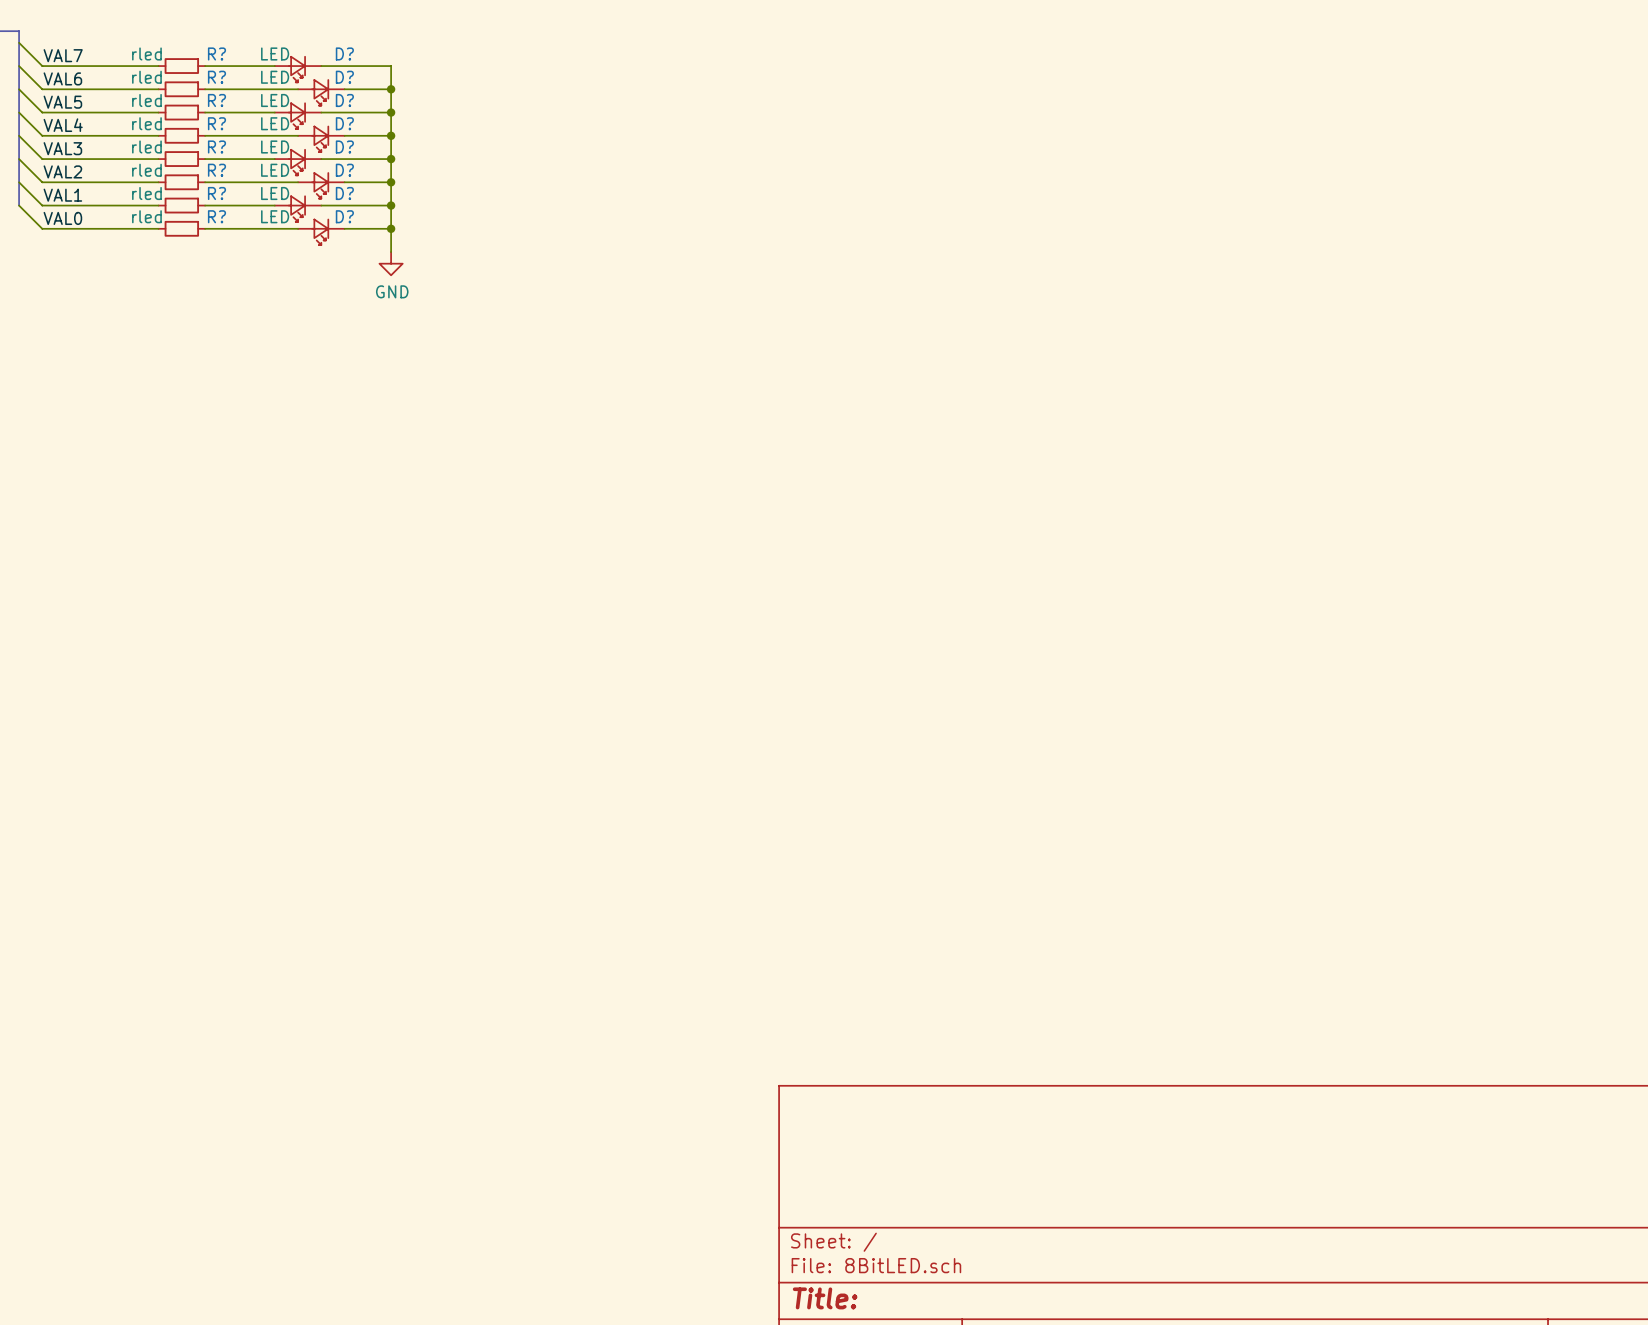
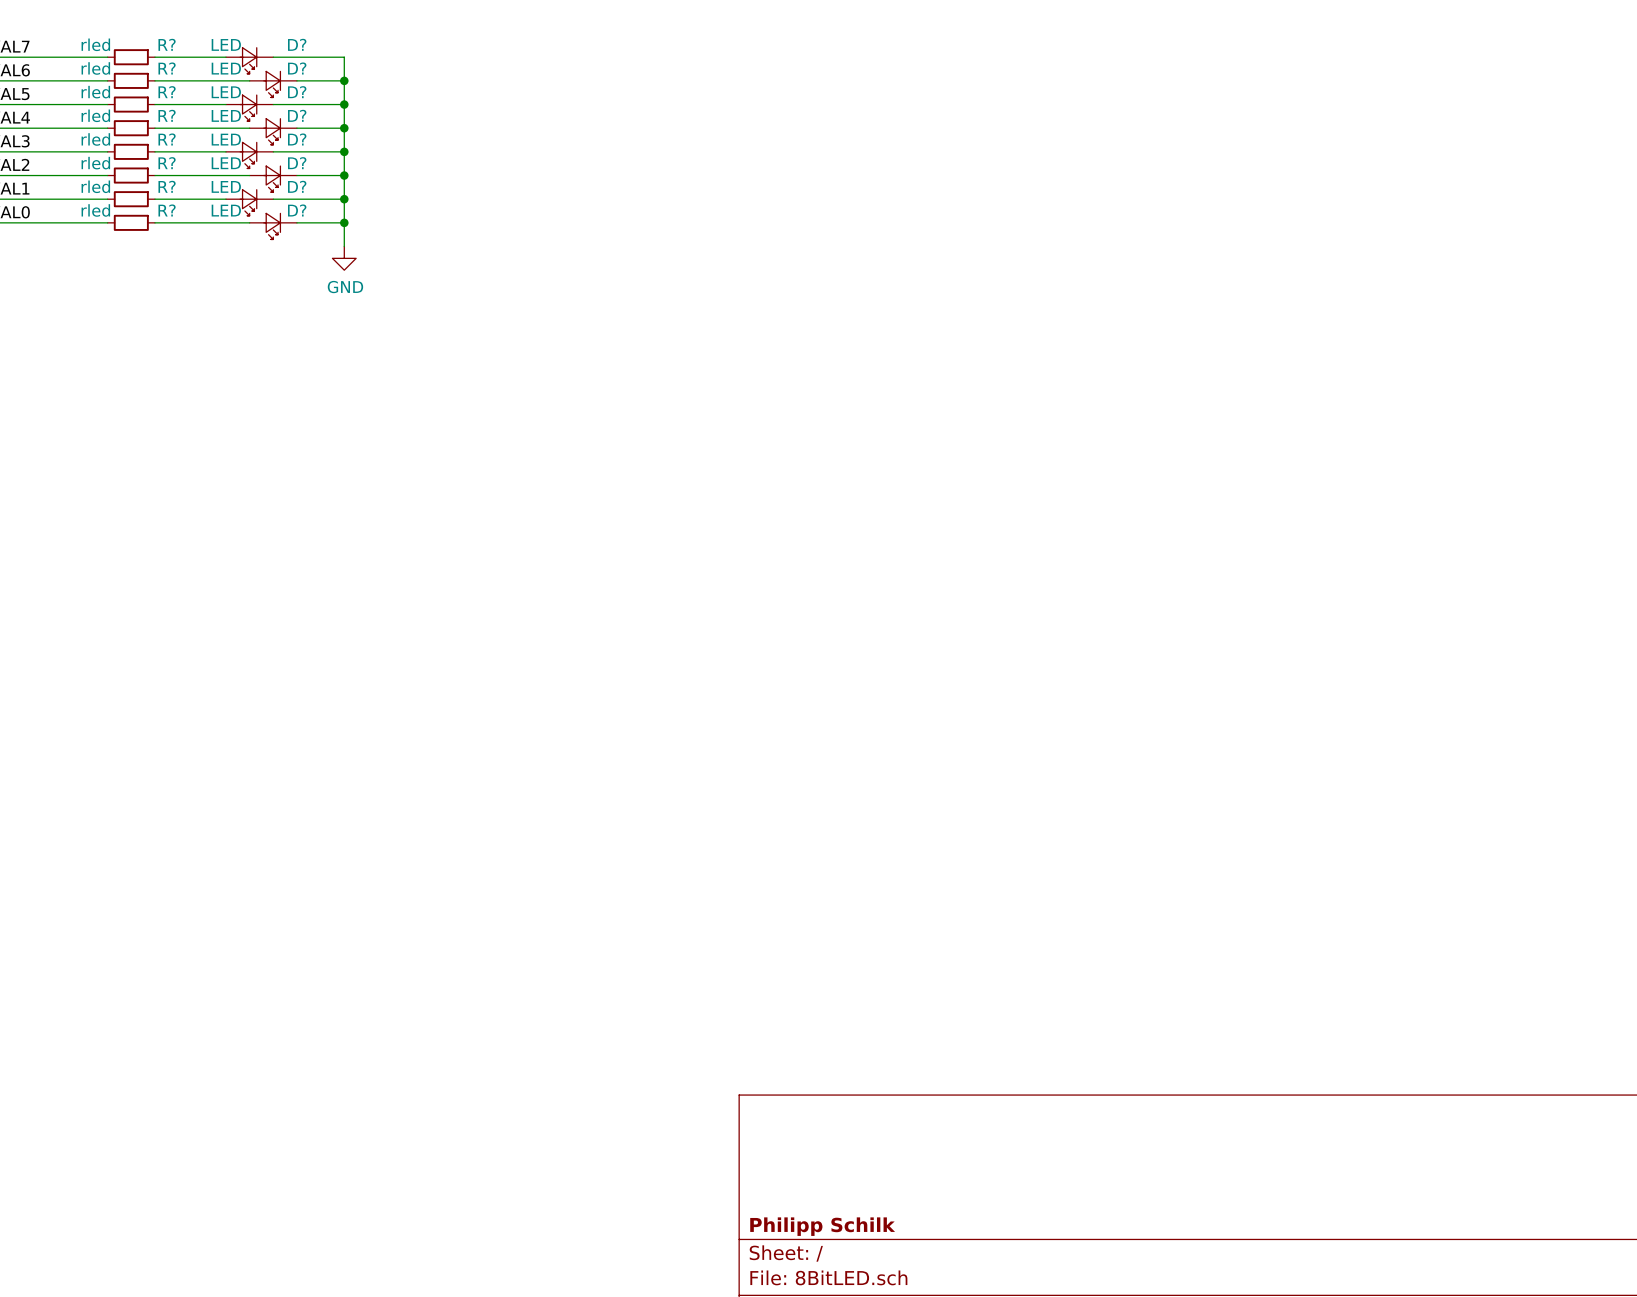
title block: none -> Philipp Schilk (822, 1226)

